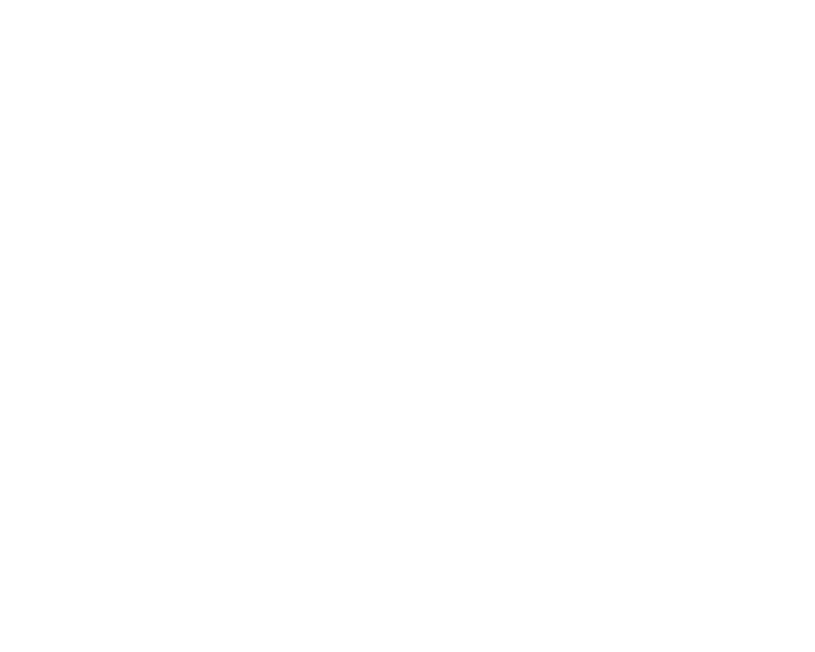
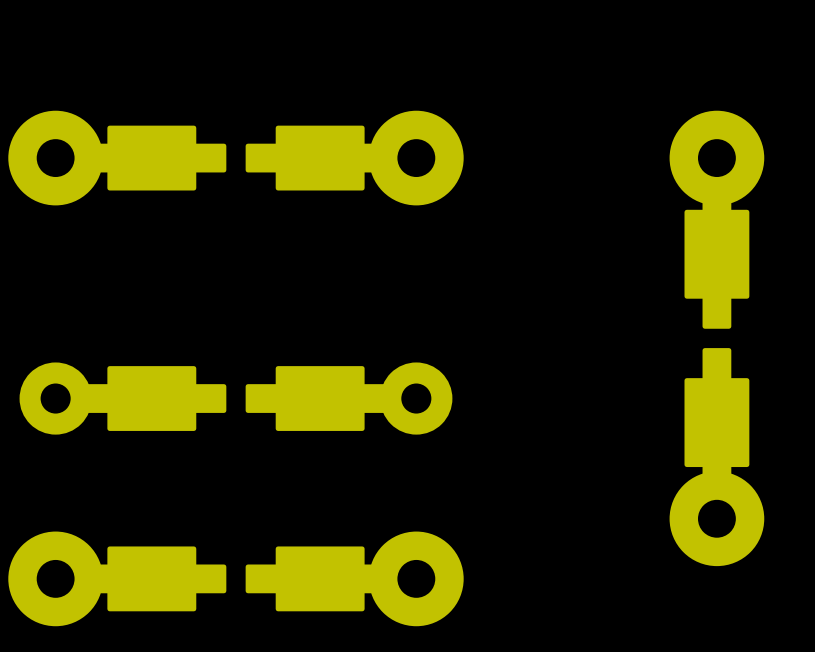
part: none -> (235, 158)
part: none -> (716, 338)
part: none -> (235, 398)
part: none -> (235, 578)

